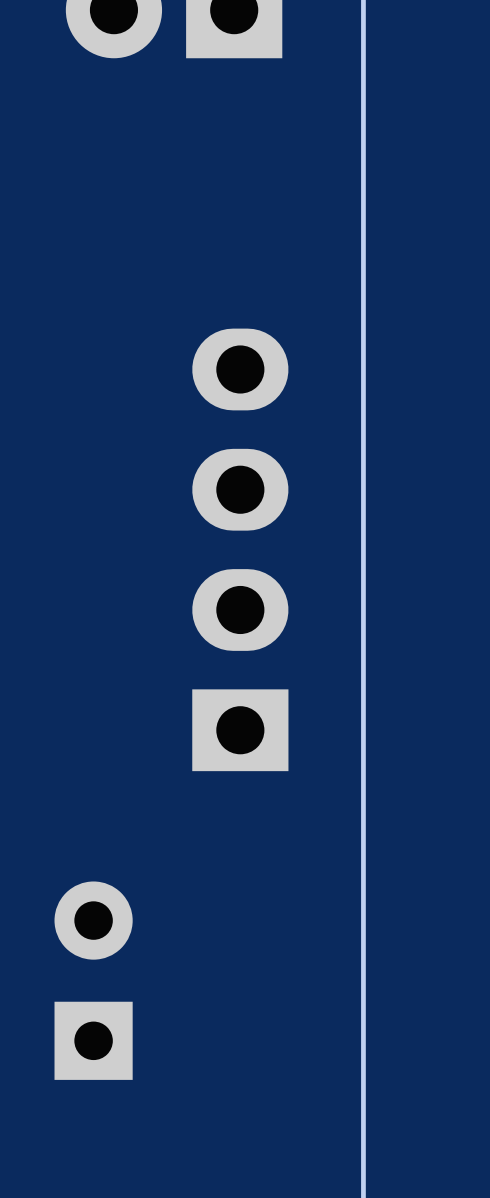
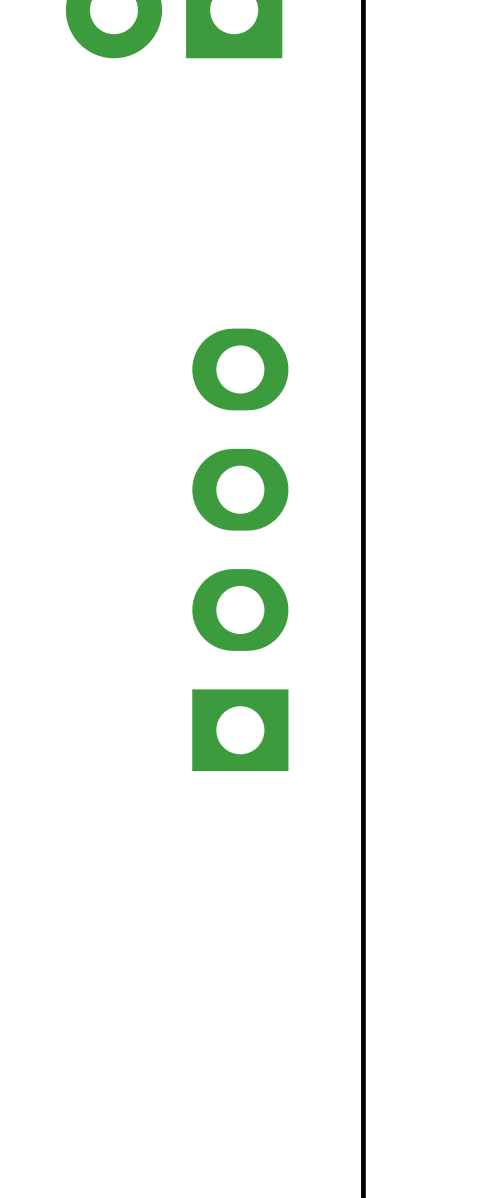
part: (93, 980) -> none

